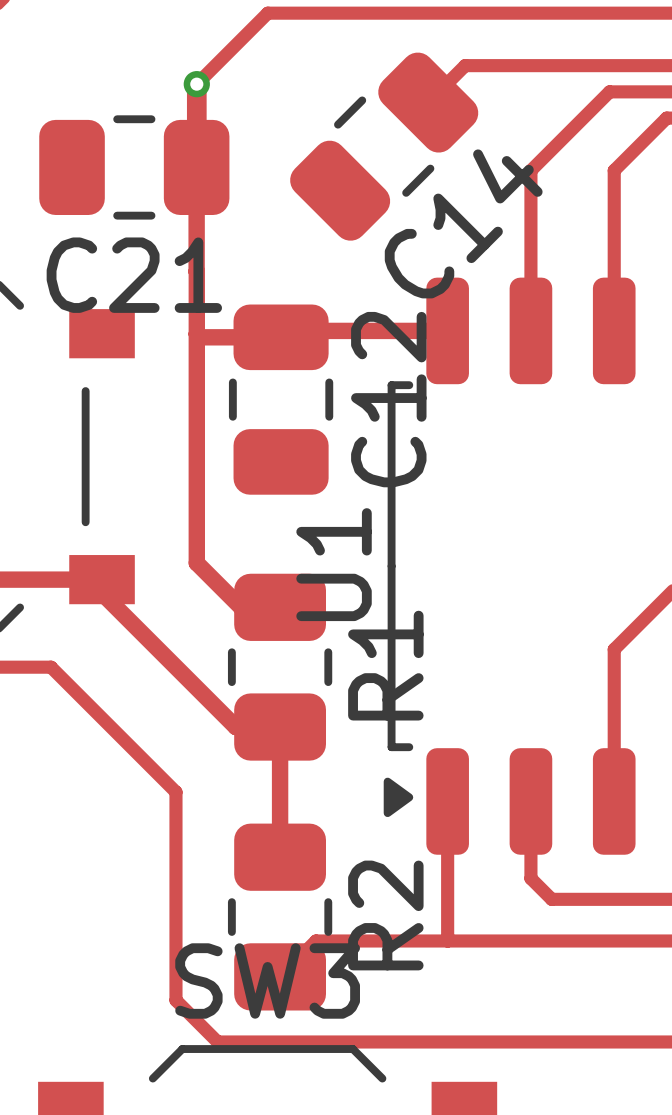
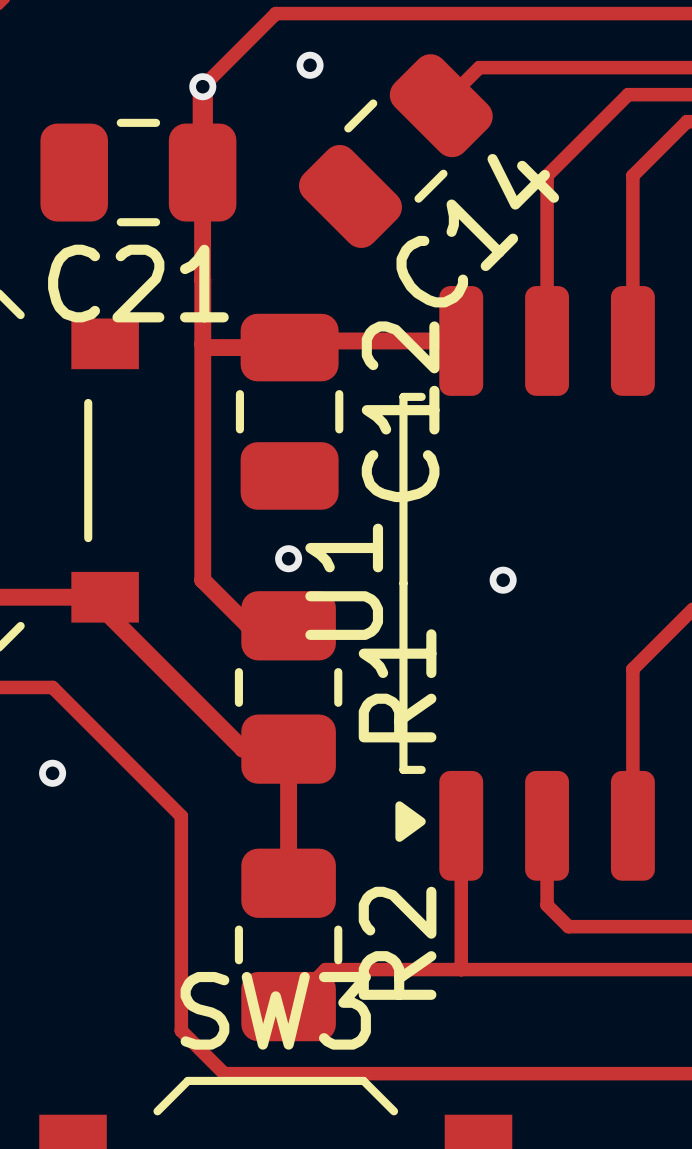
via: none -> (310, 65)
via: none -> (288, 558)
via: none -> (503, 580)
via: none -> (52, 773)

